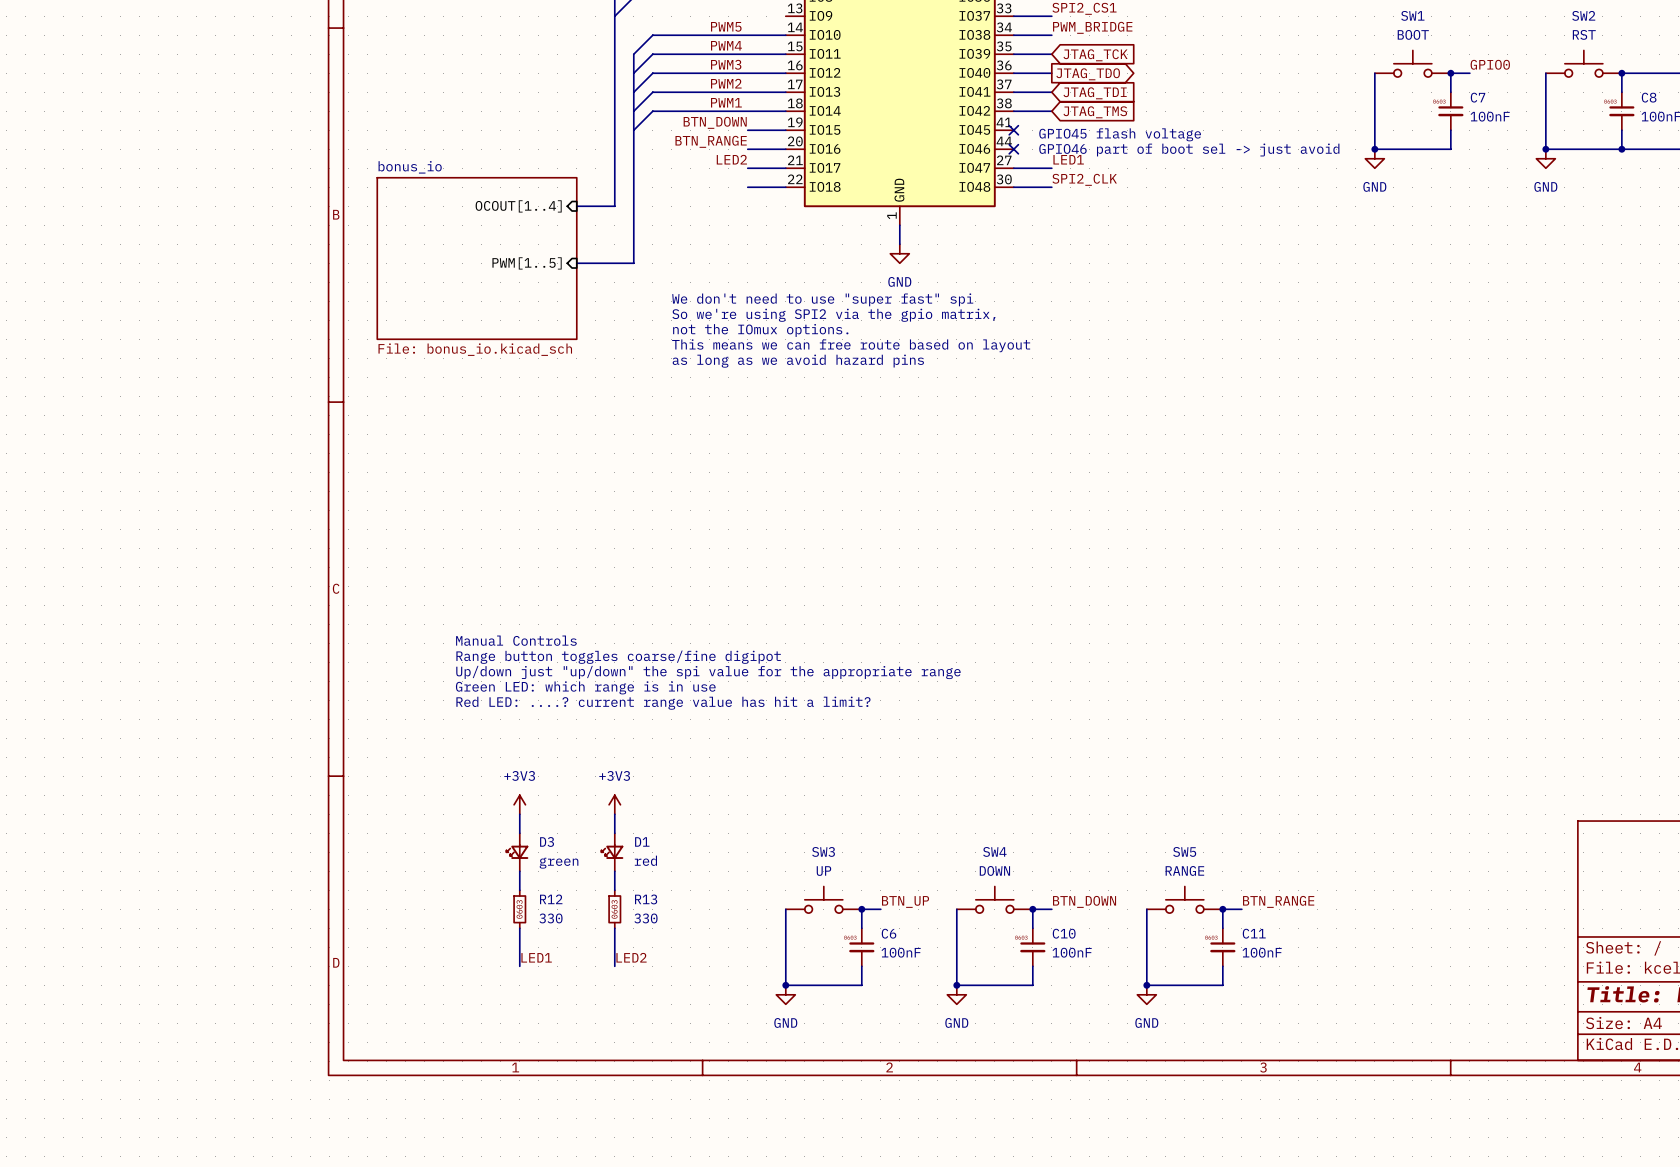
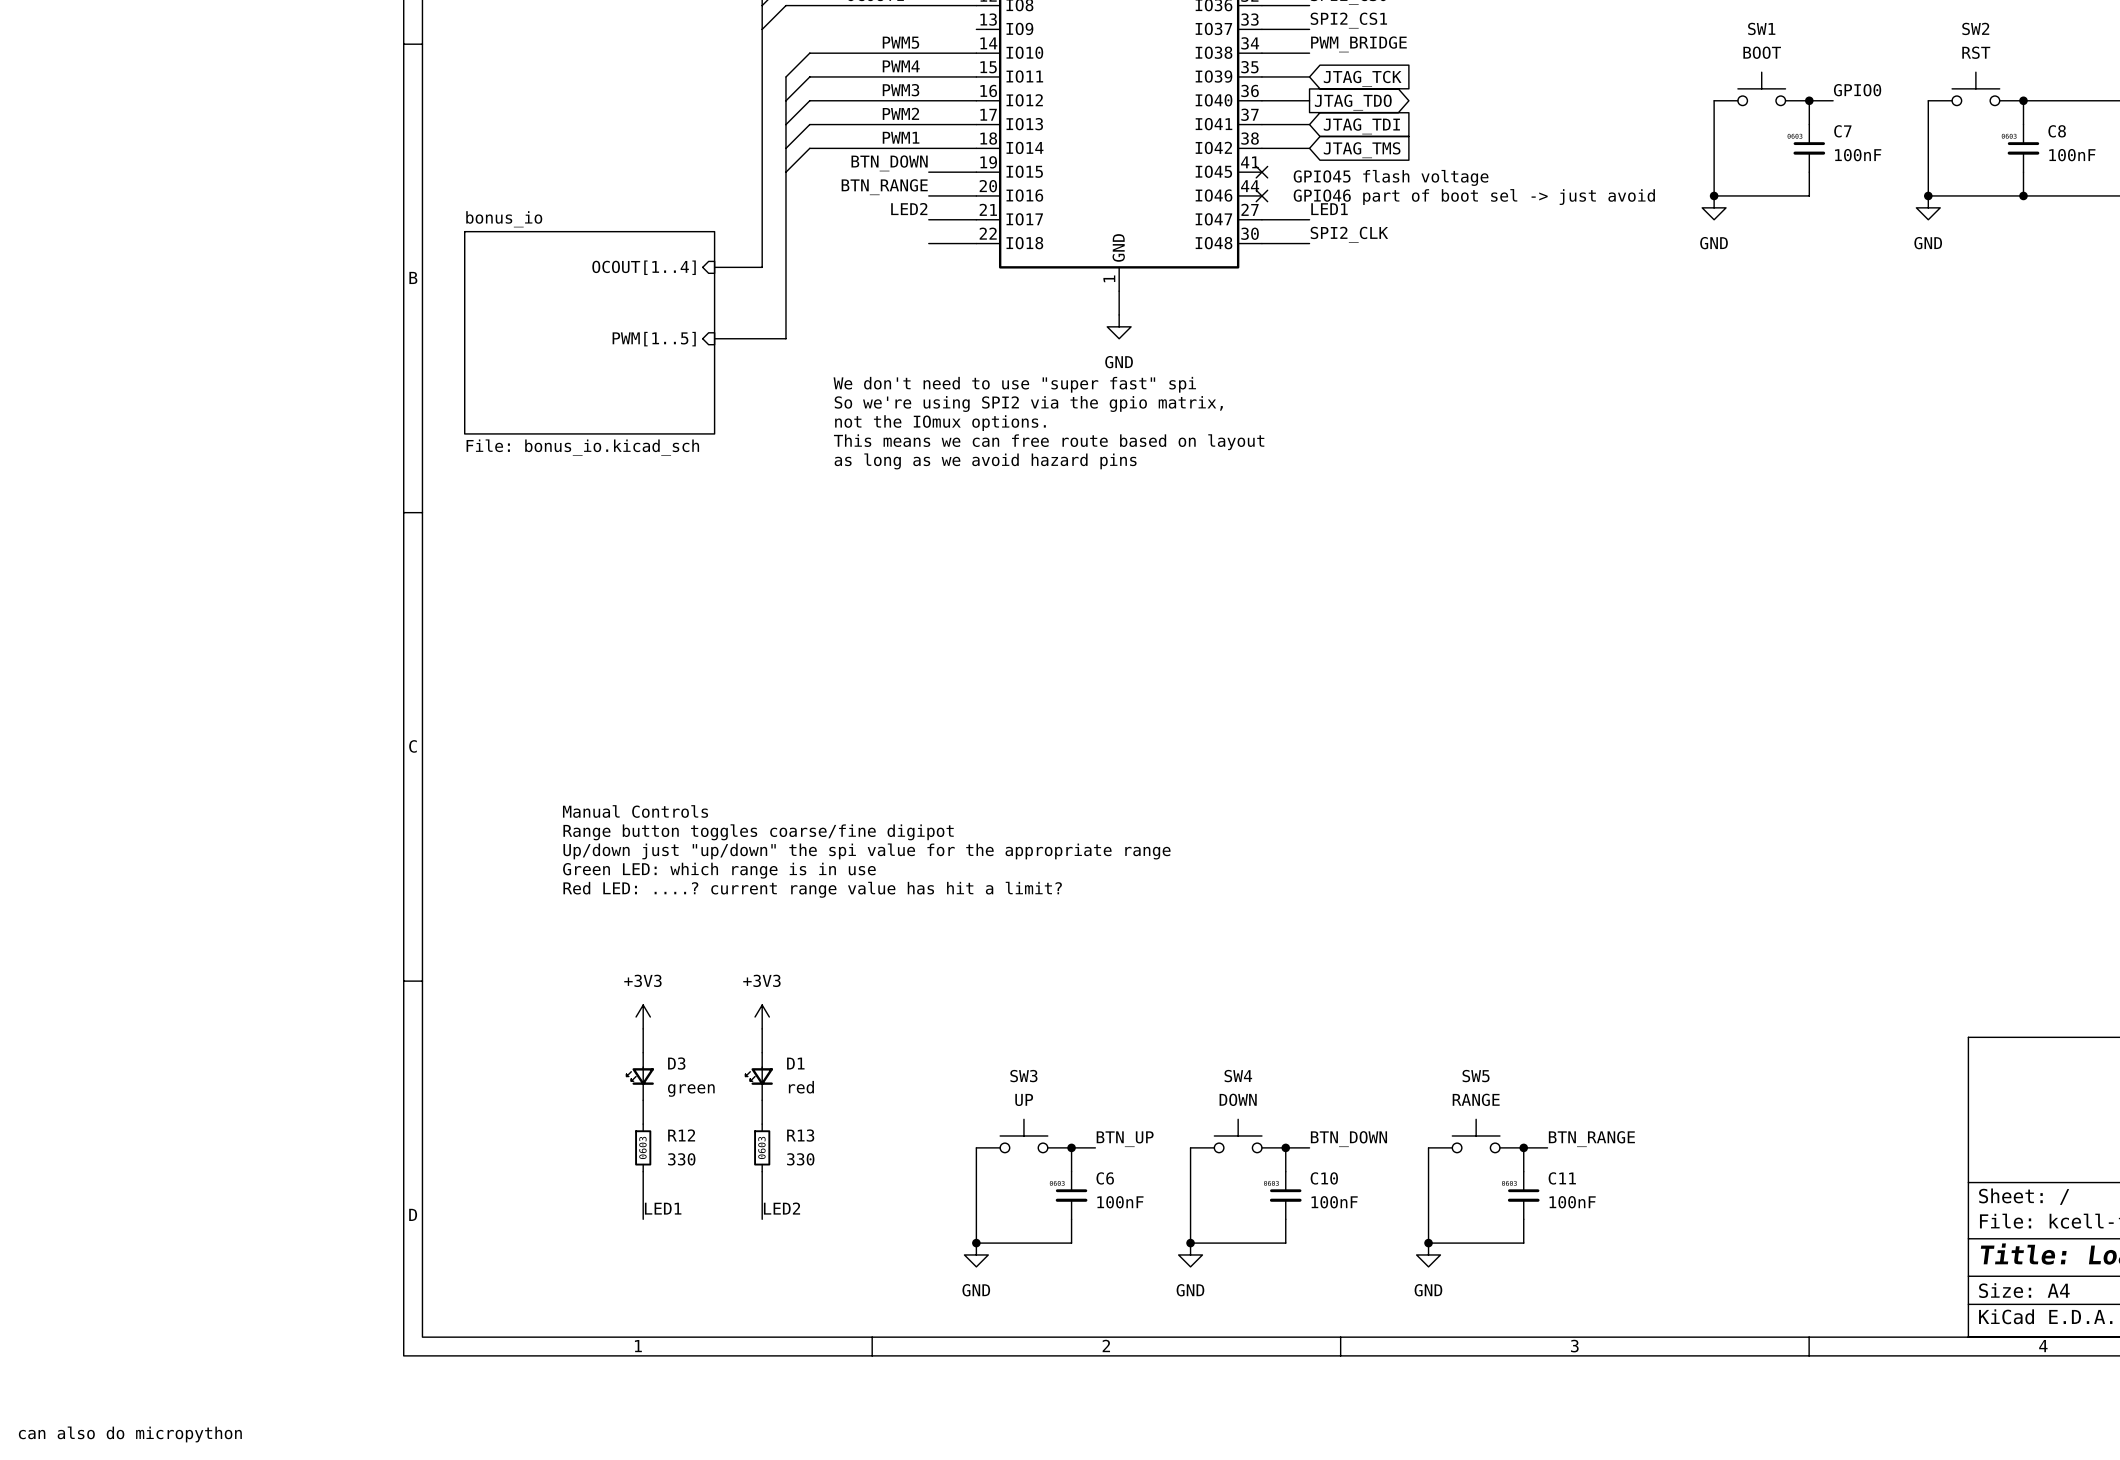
text: none -> can also do micropython (130, 1434)

